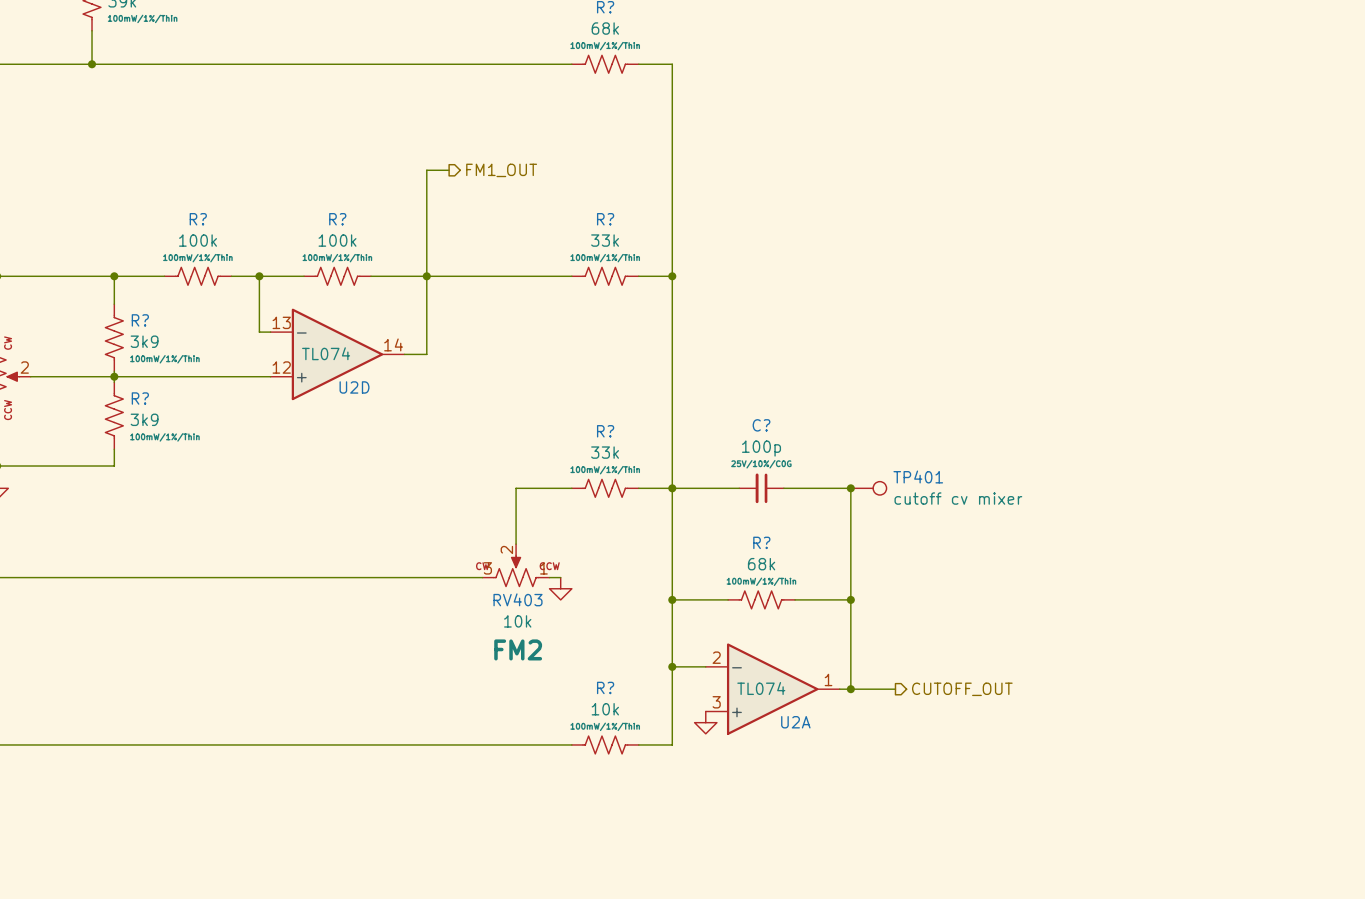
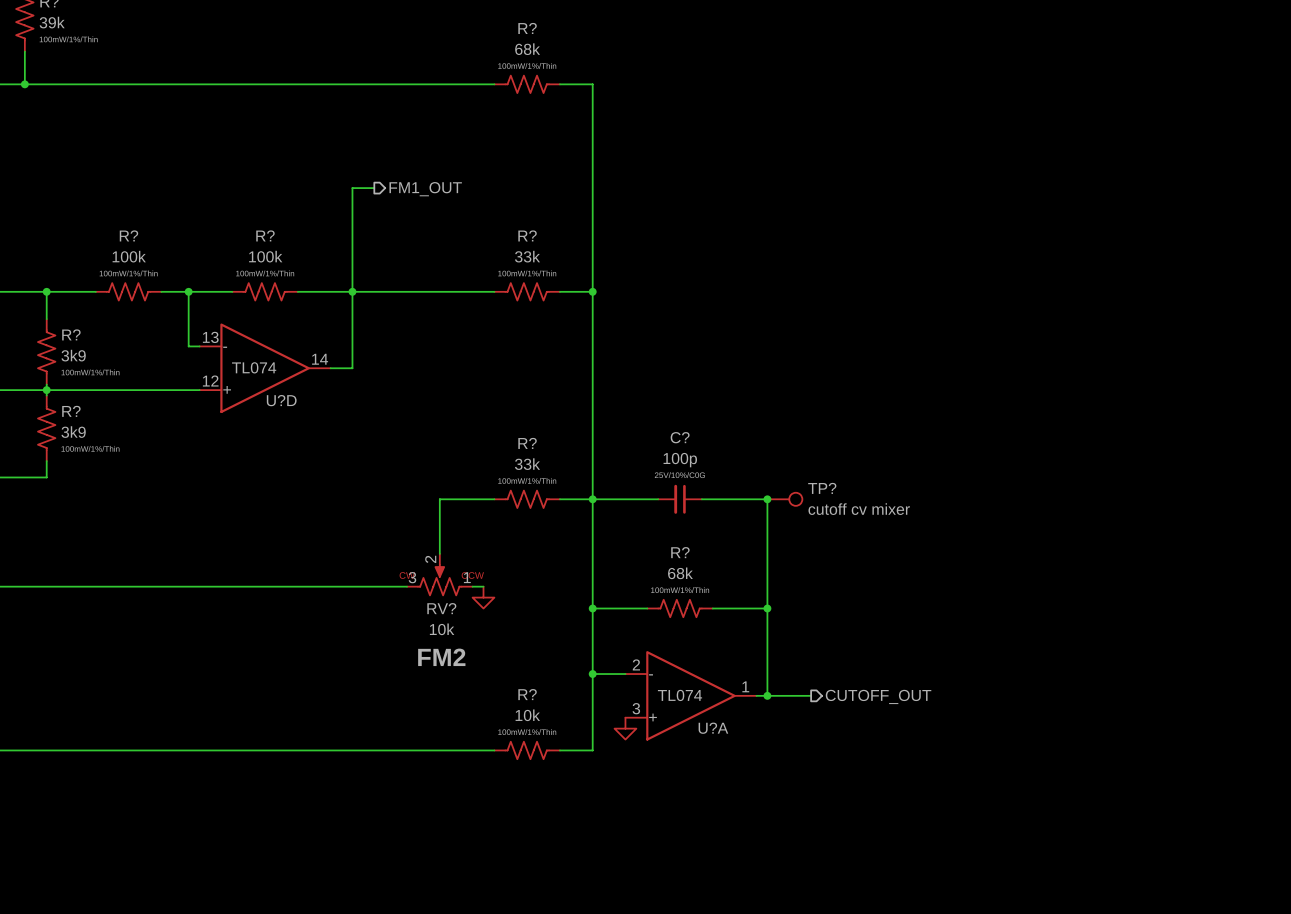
U2D name: U2D (354, 387) -> U?D (281, 400)
TP401 name: TP401 (918, 476) -> TP? (822, 488)
RV403 name: RV403 (518, 599) -> RV? (441, 608)
U2A name: U2A (795, 722) -> U?A (713, 728)

